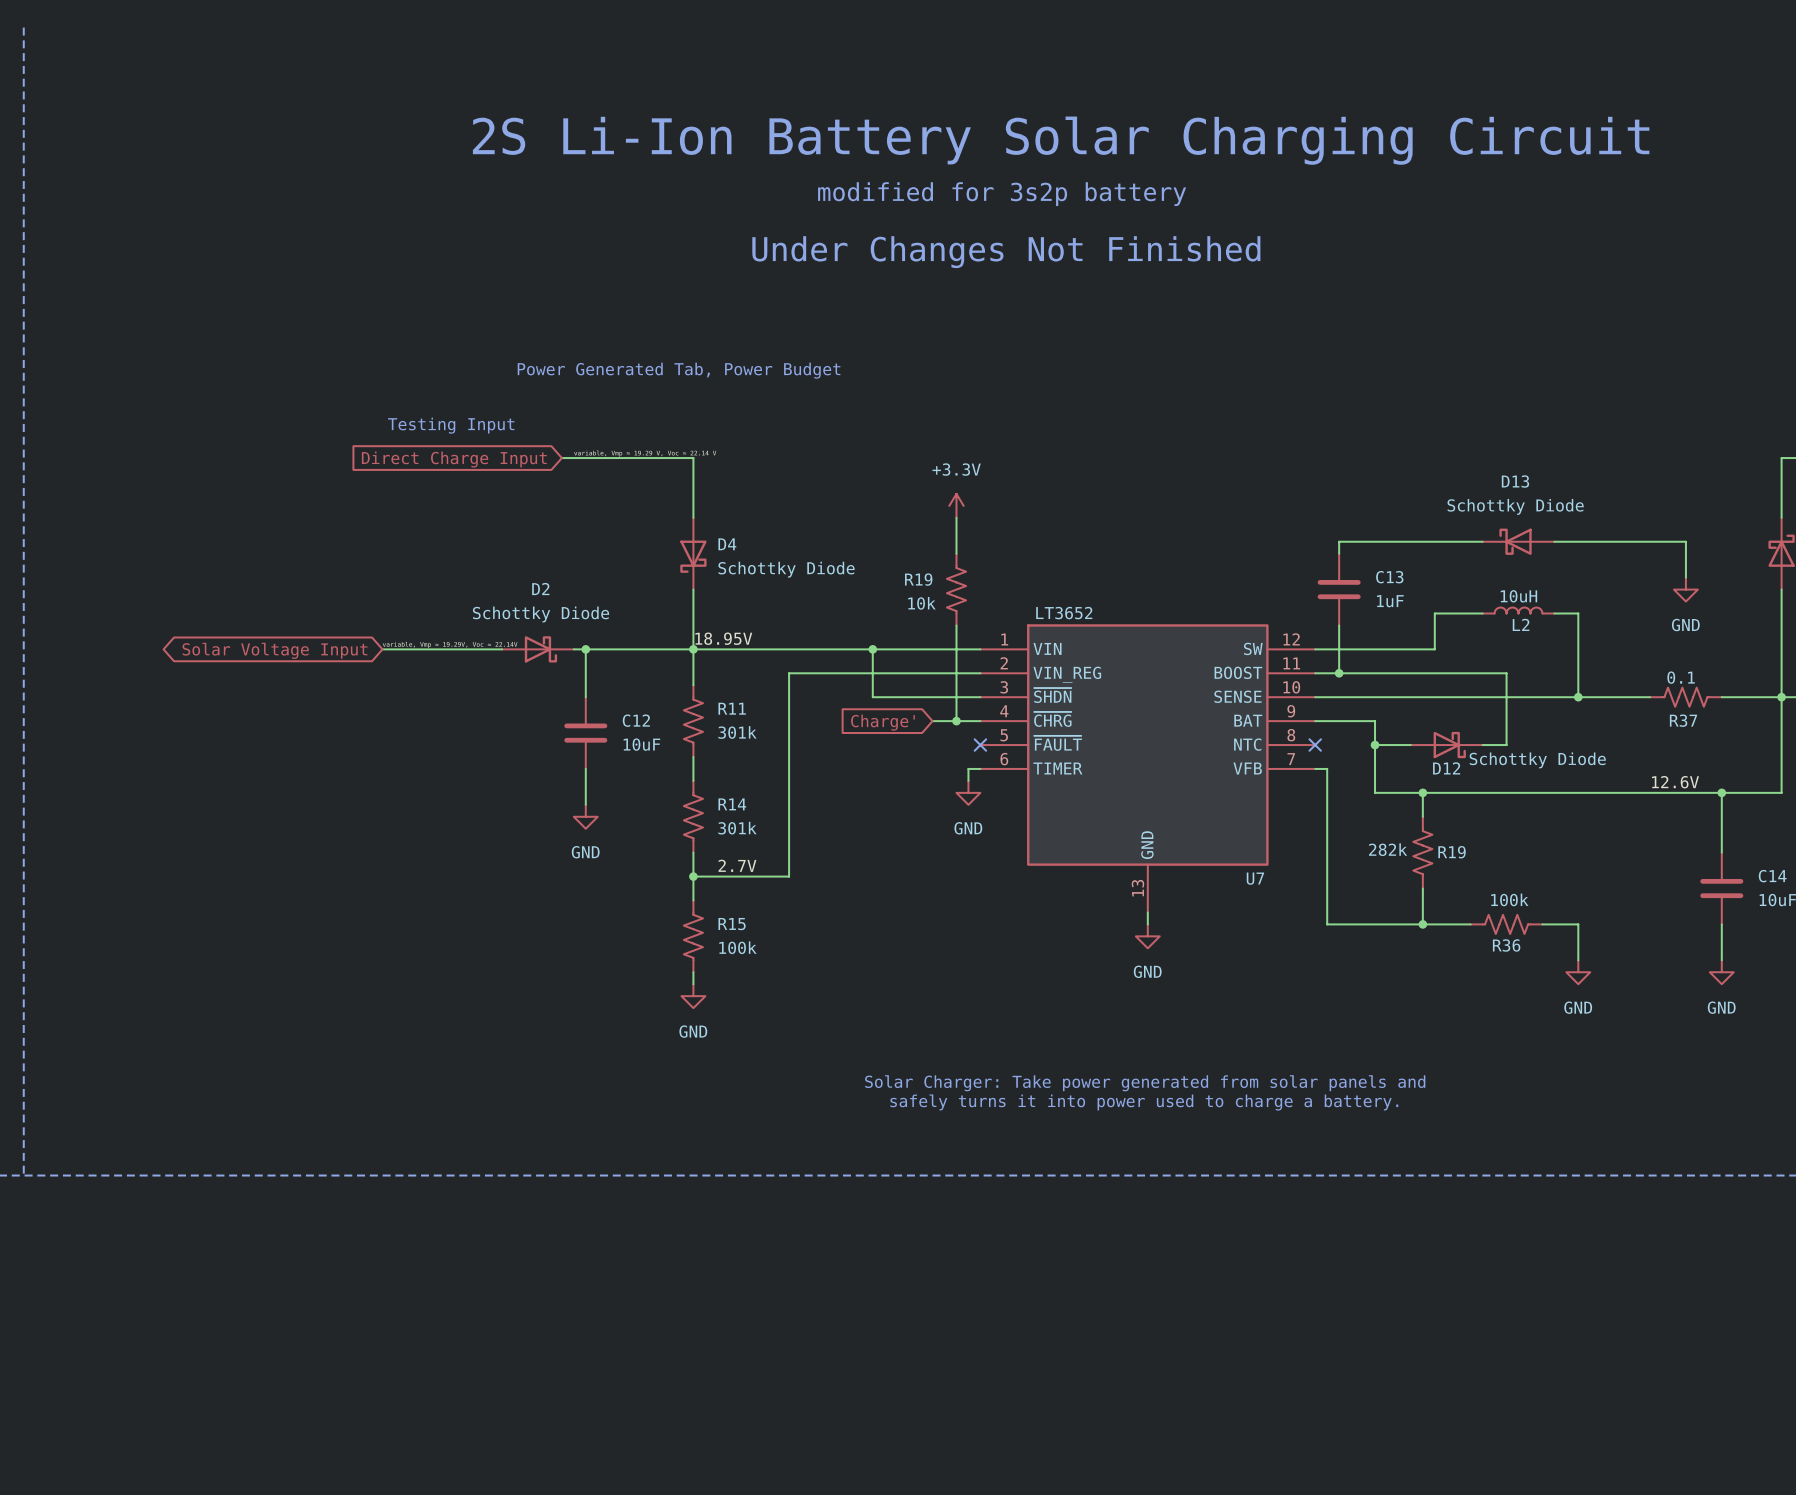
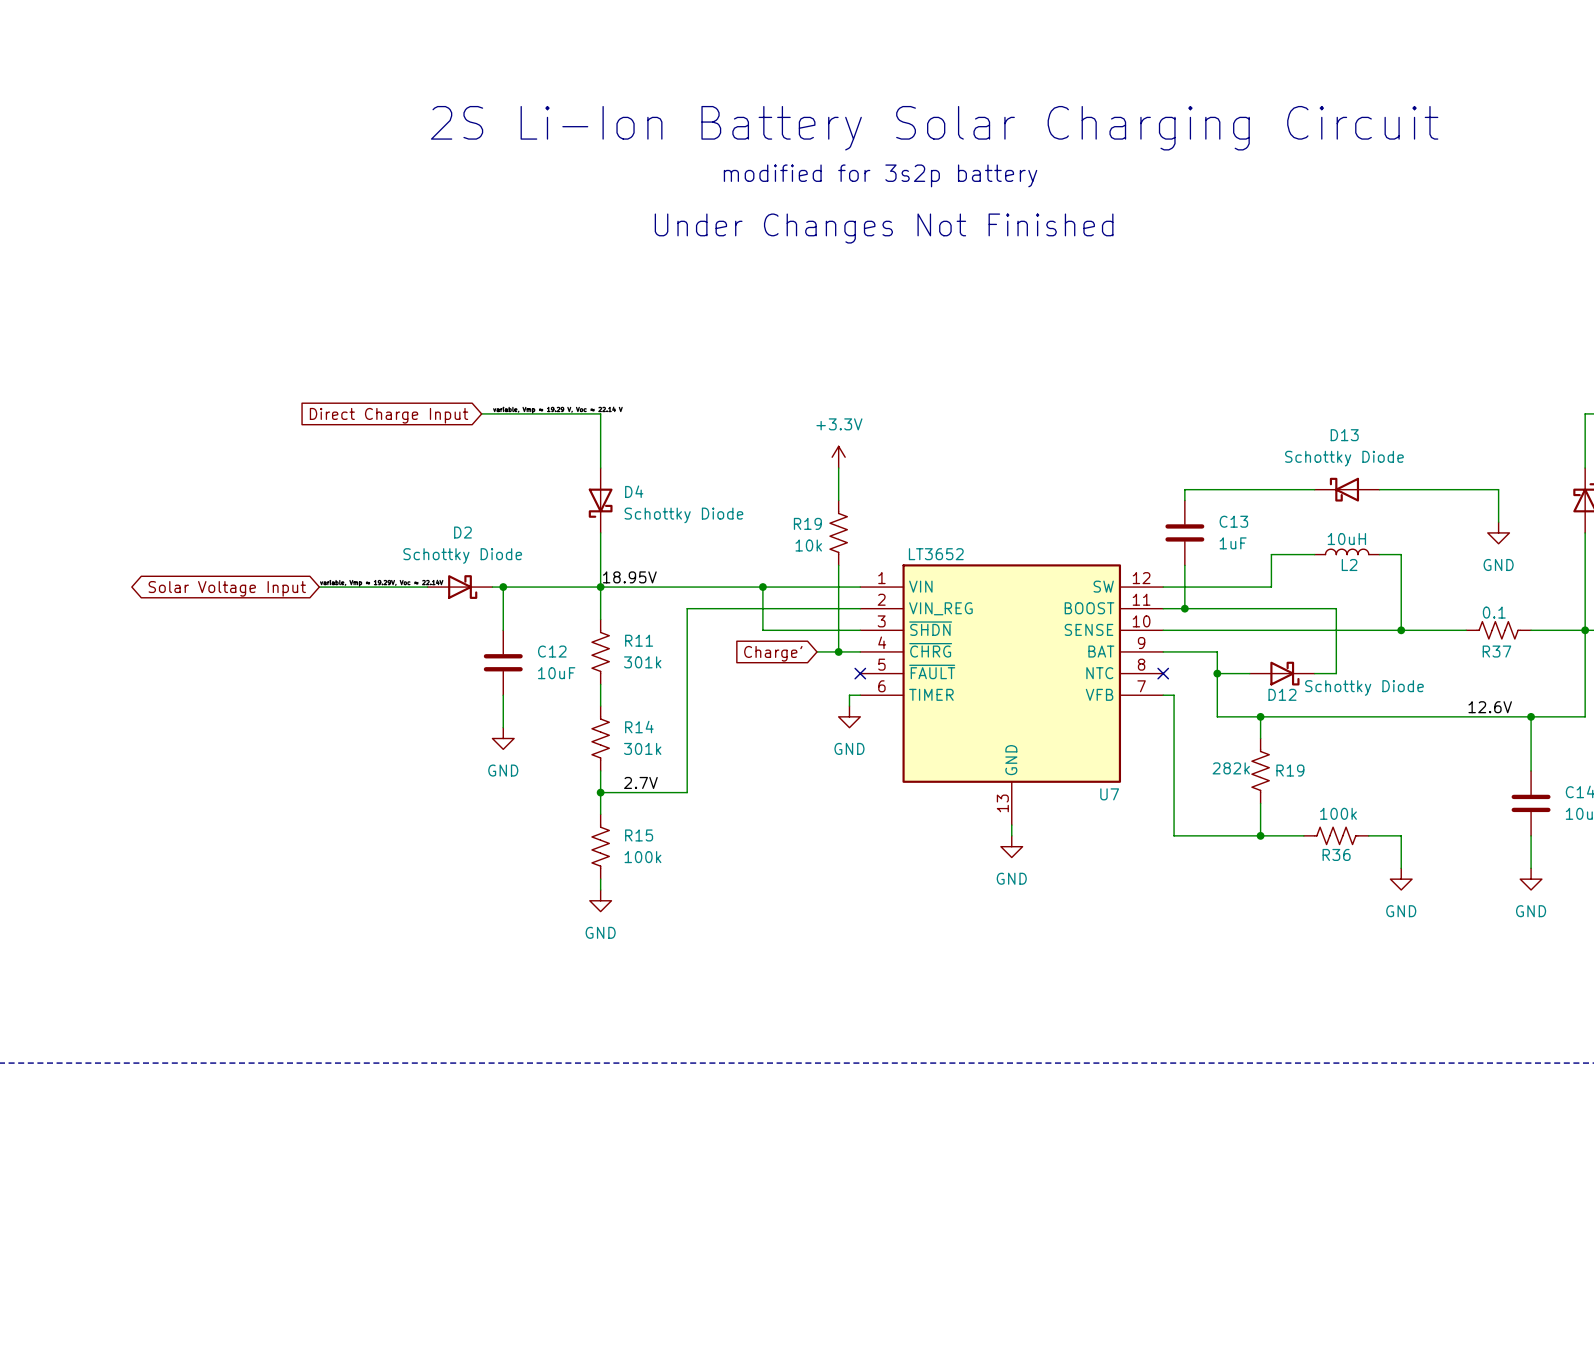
text: Power Generated Tab, Power Budget (679, 370) -> none
text: Testing Input (451, 425) -> none
text: Solar Charger: Take power generated from solar panels and (1145, 1083) -> none
text: safely turns it into power used to charge a battery. (1144, 1102) -> none

